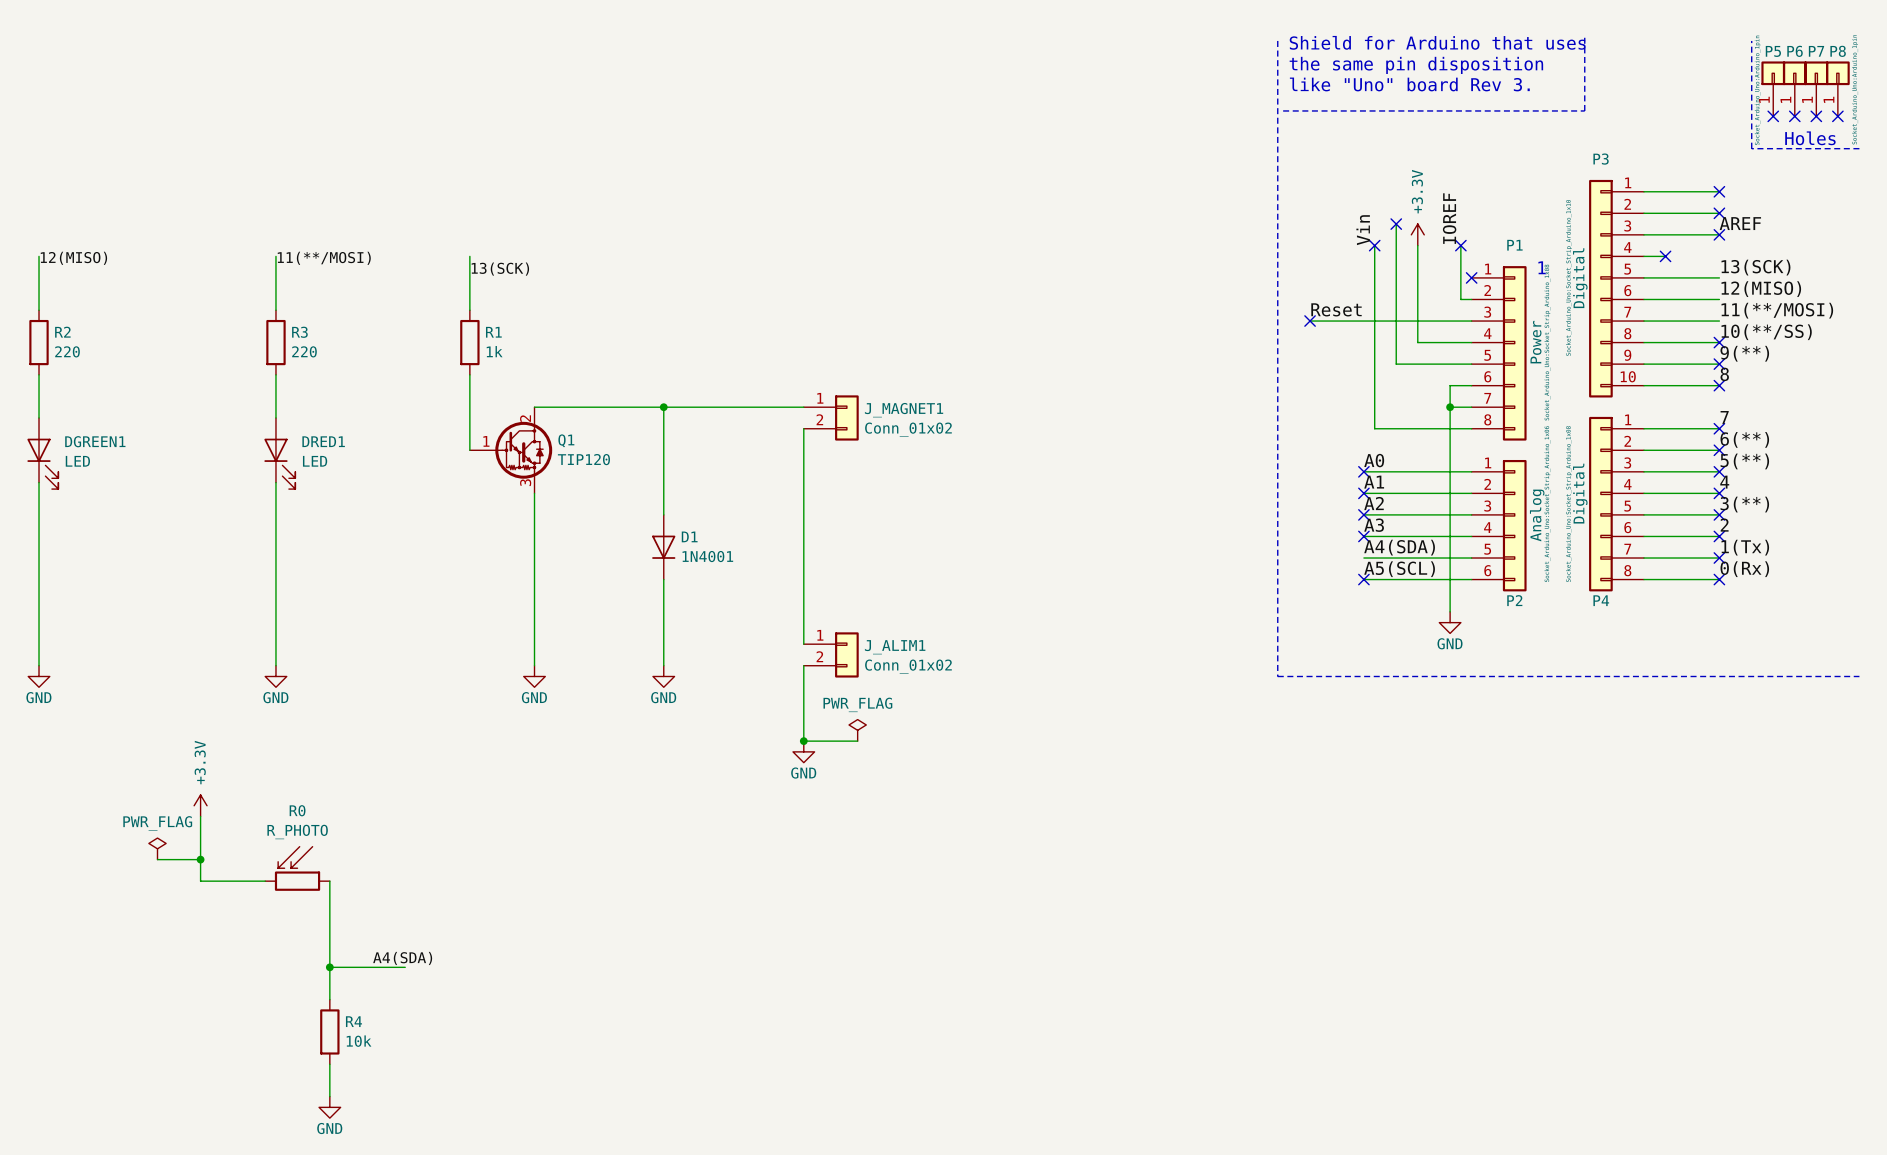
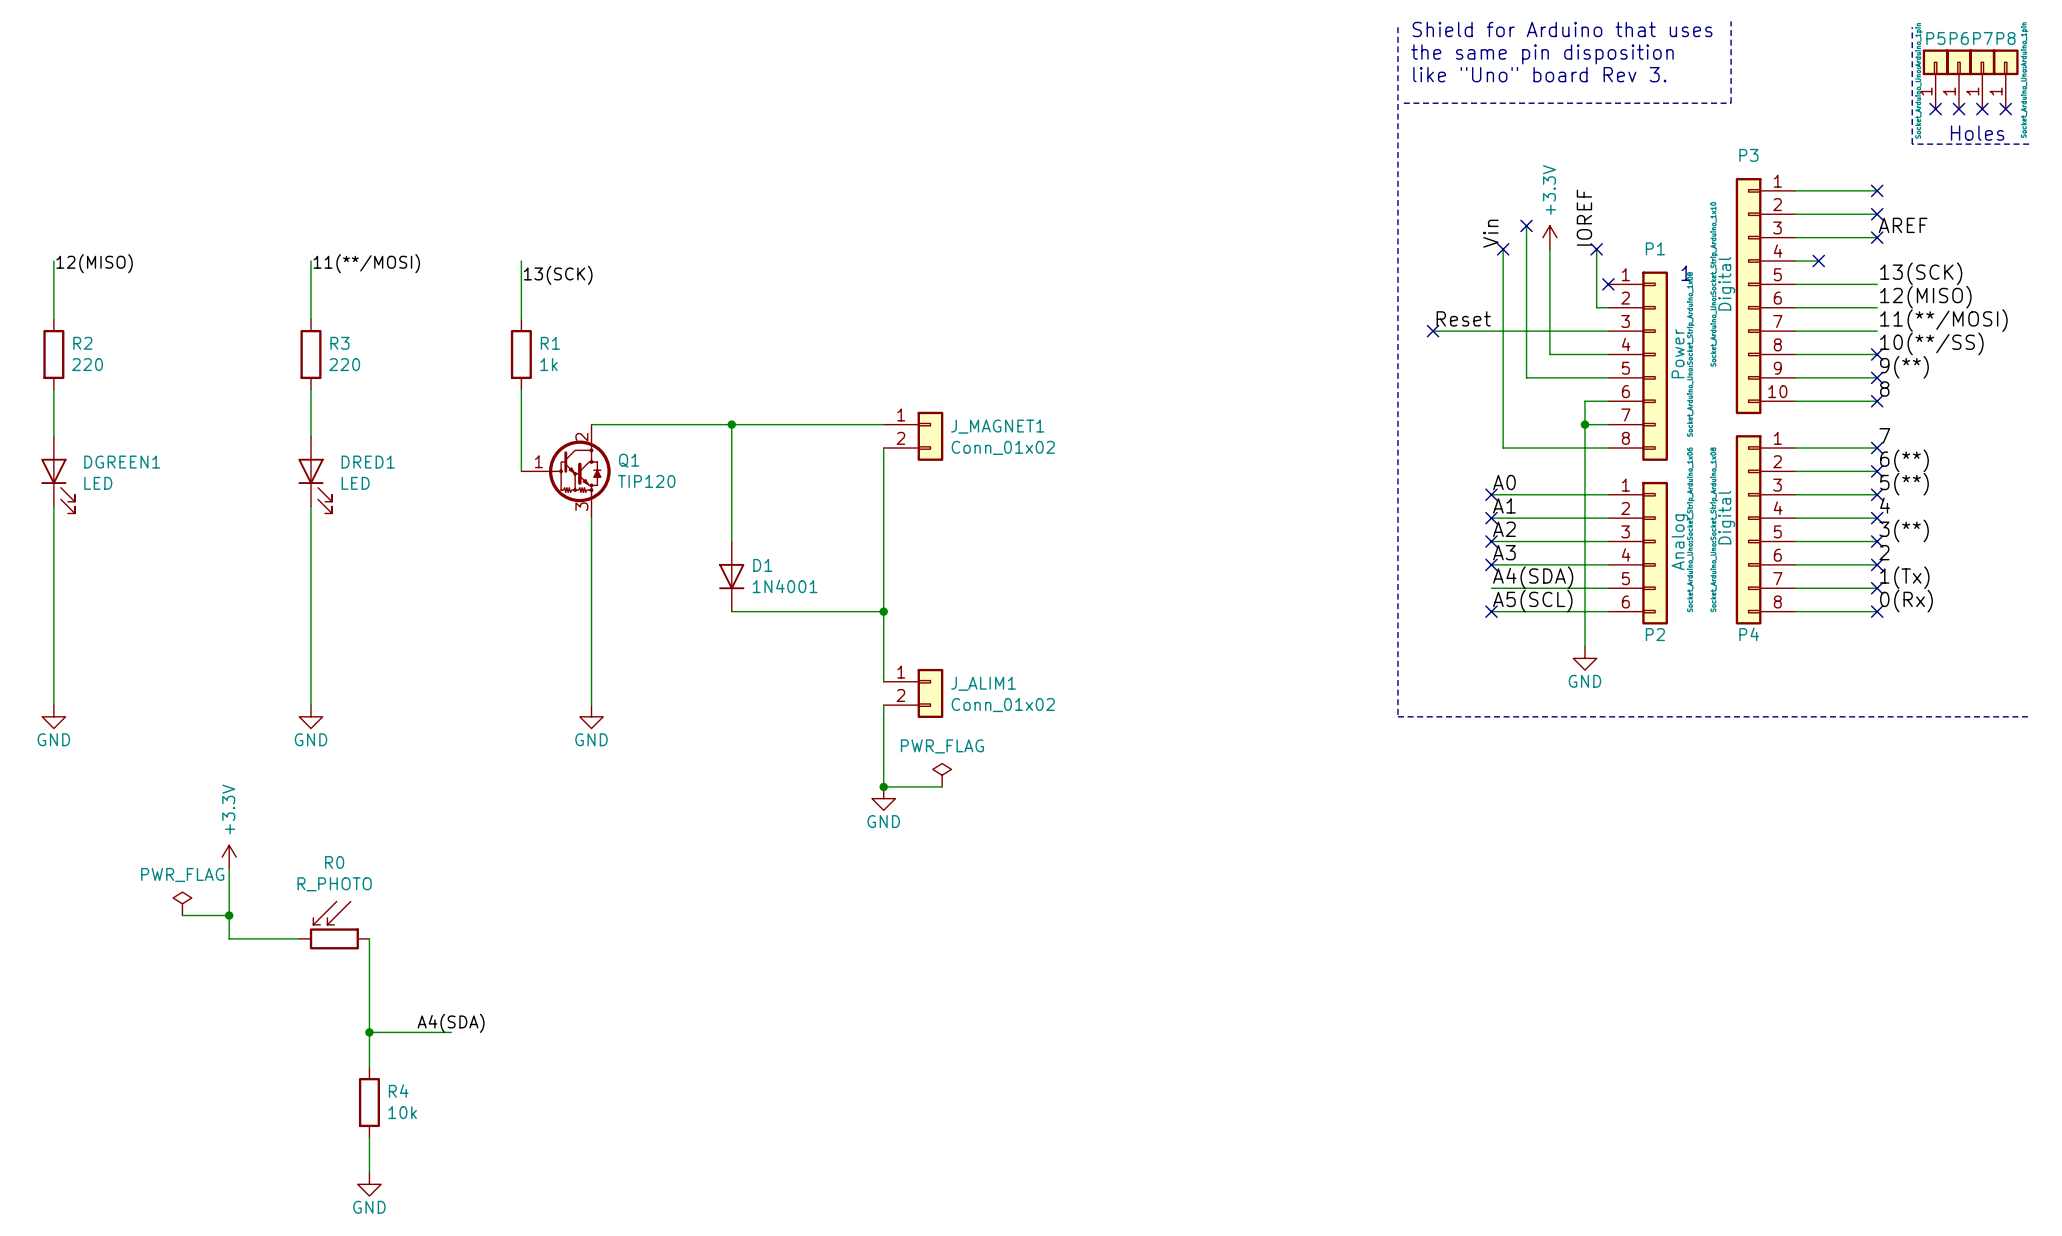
wire: (663, 579) (663, 665) -> (731, 611) (883, 611)
junction: none -> (883, 611)
power symbol: GND (663, 676) -> none

